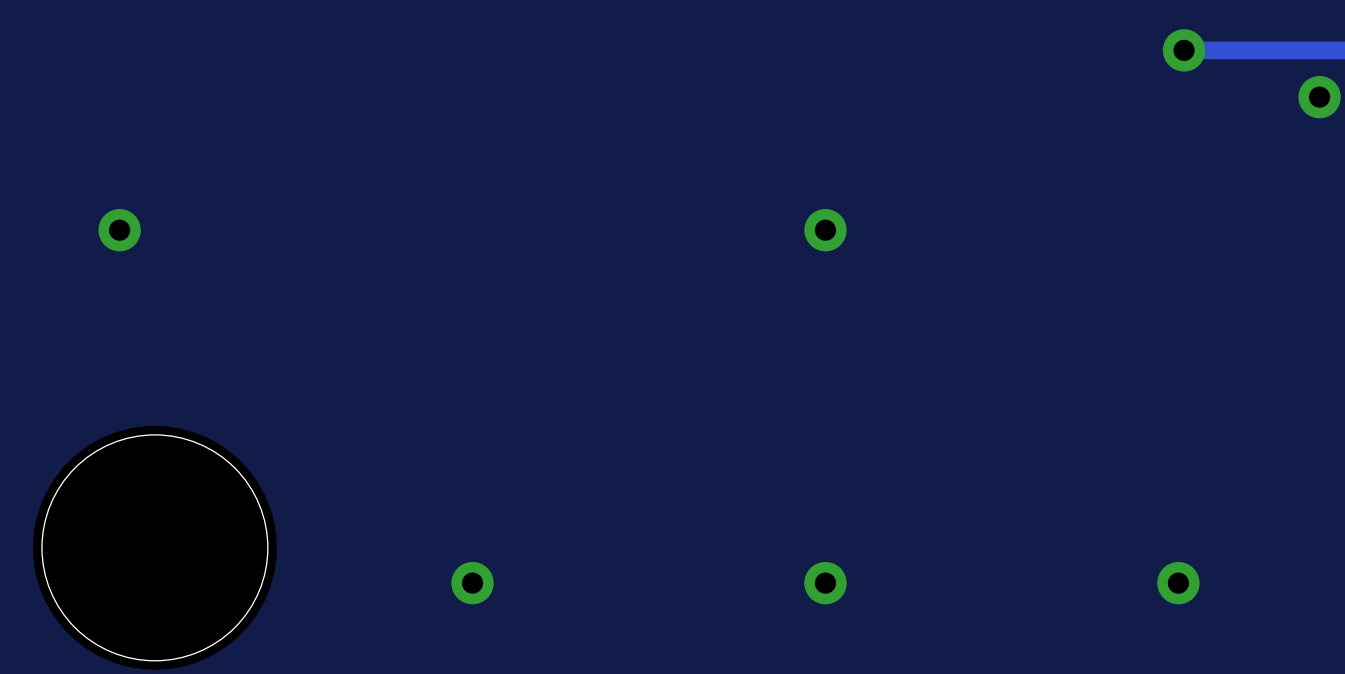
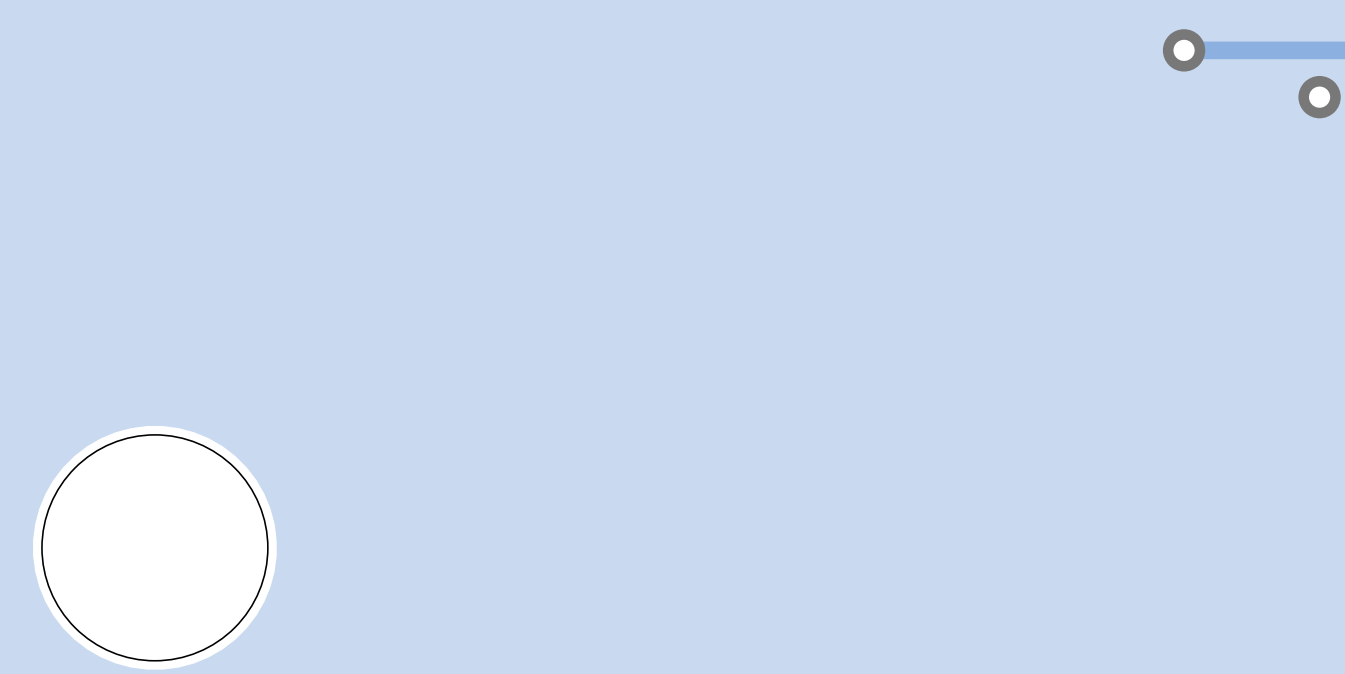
via: (119, 230) -> none
via: (825, 230) -> none
via: (472, 583) -> none
via: (825, 583) -> none
via: (1178, 583) -> none

